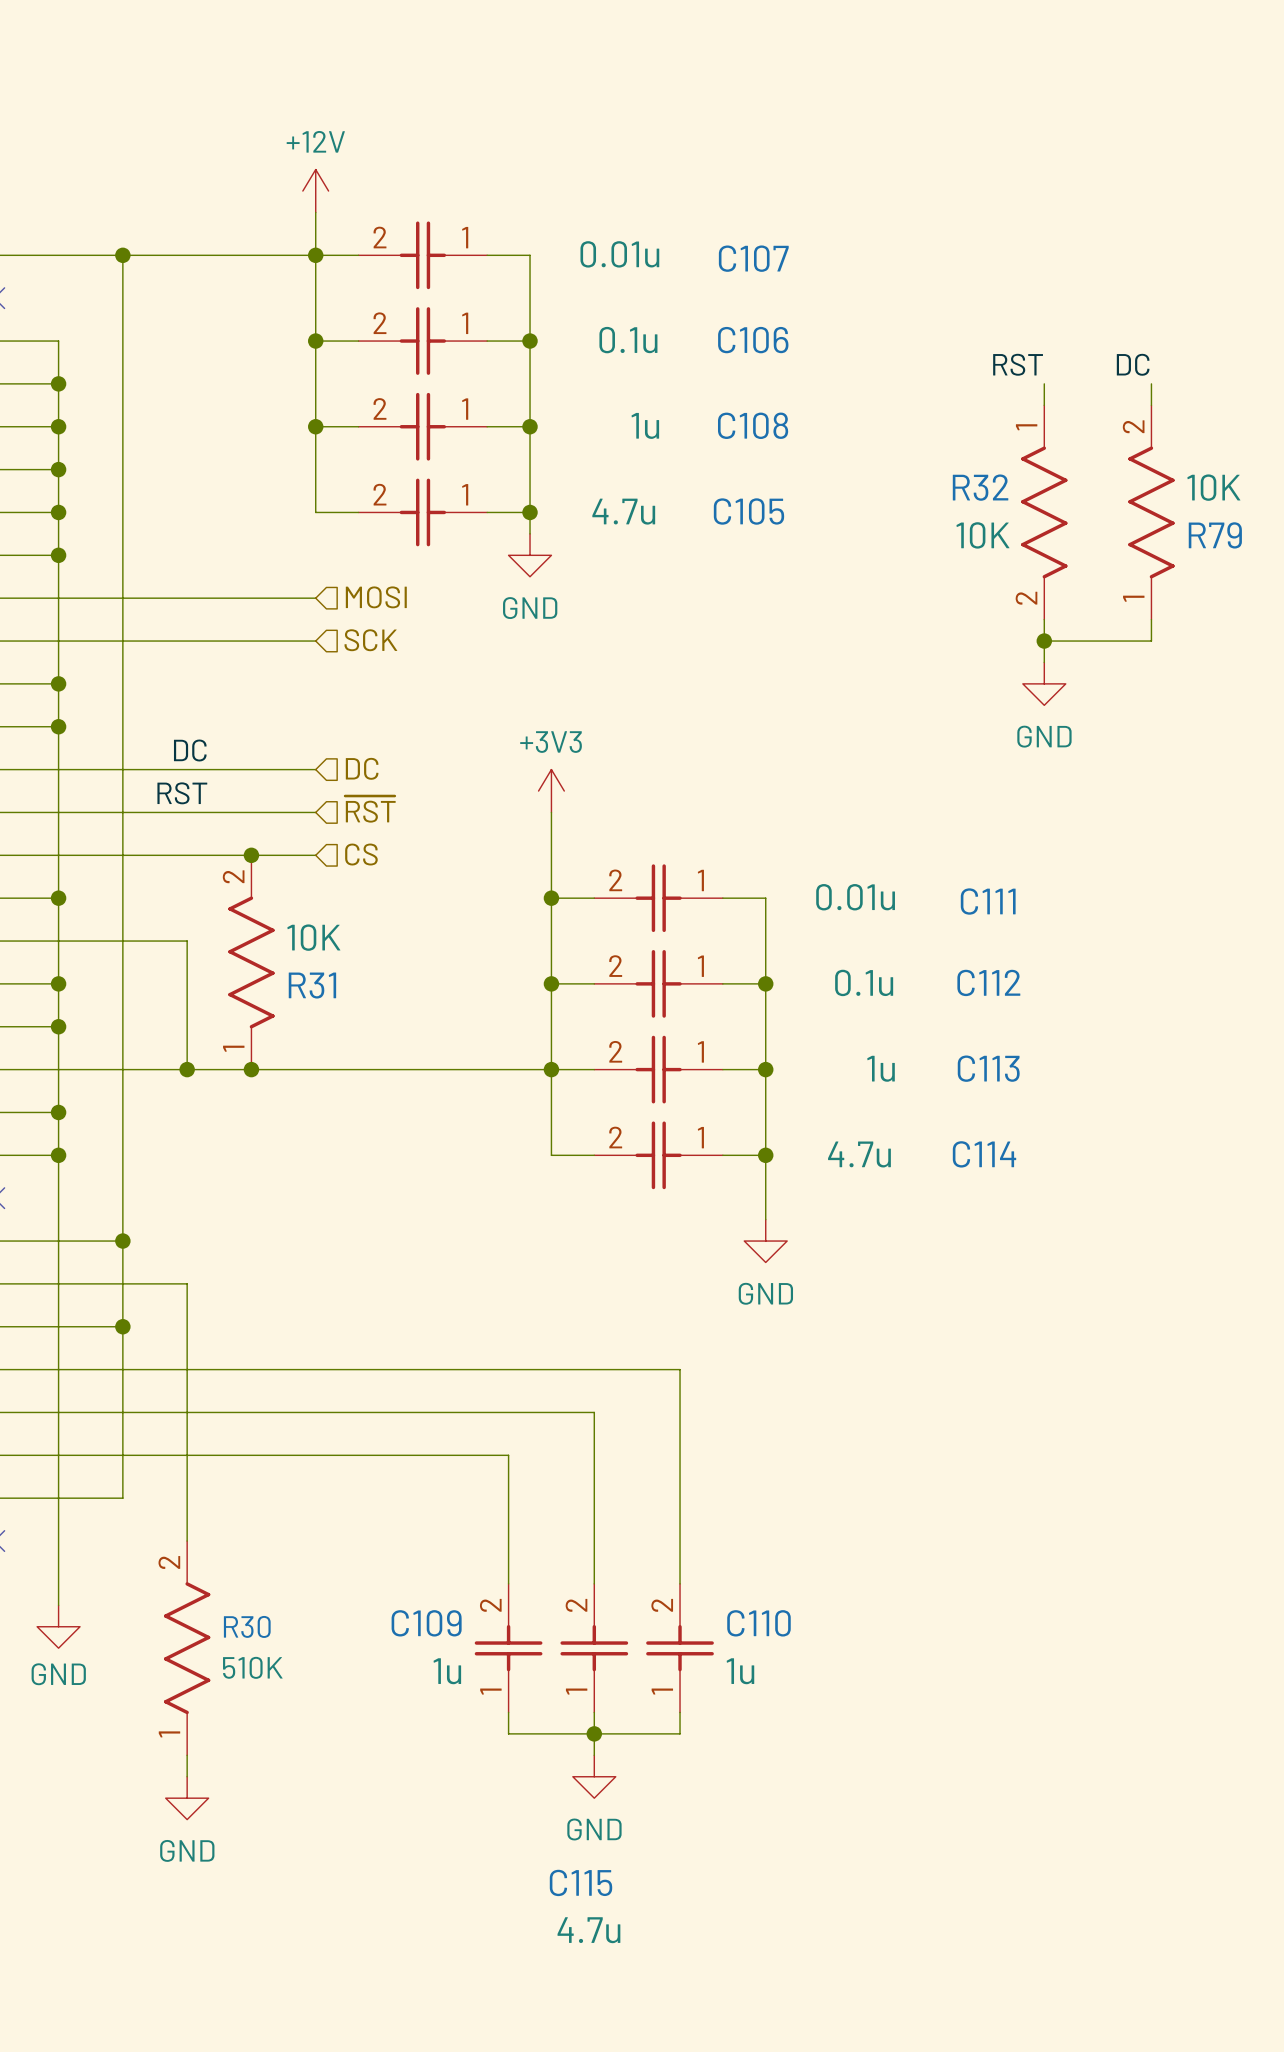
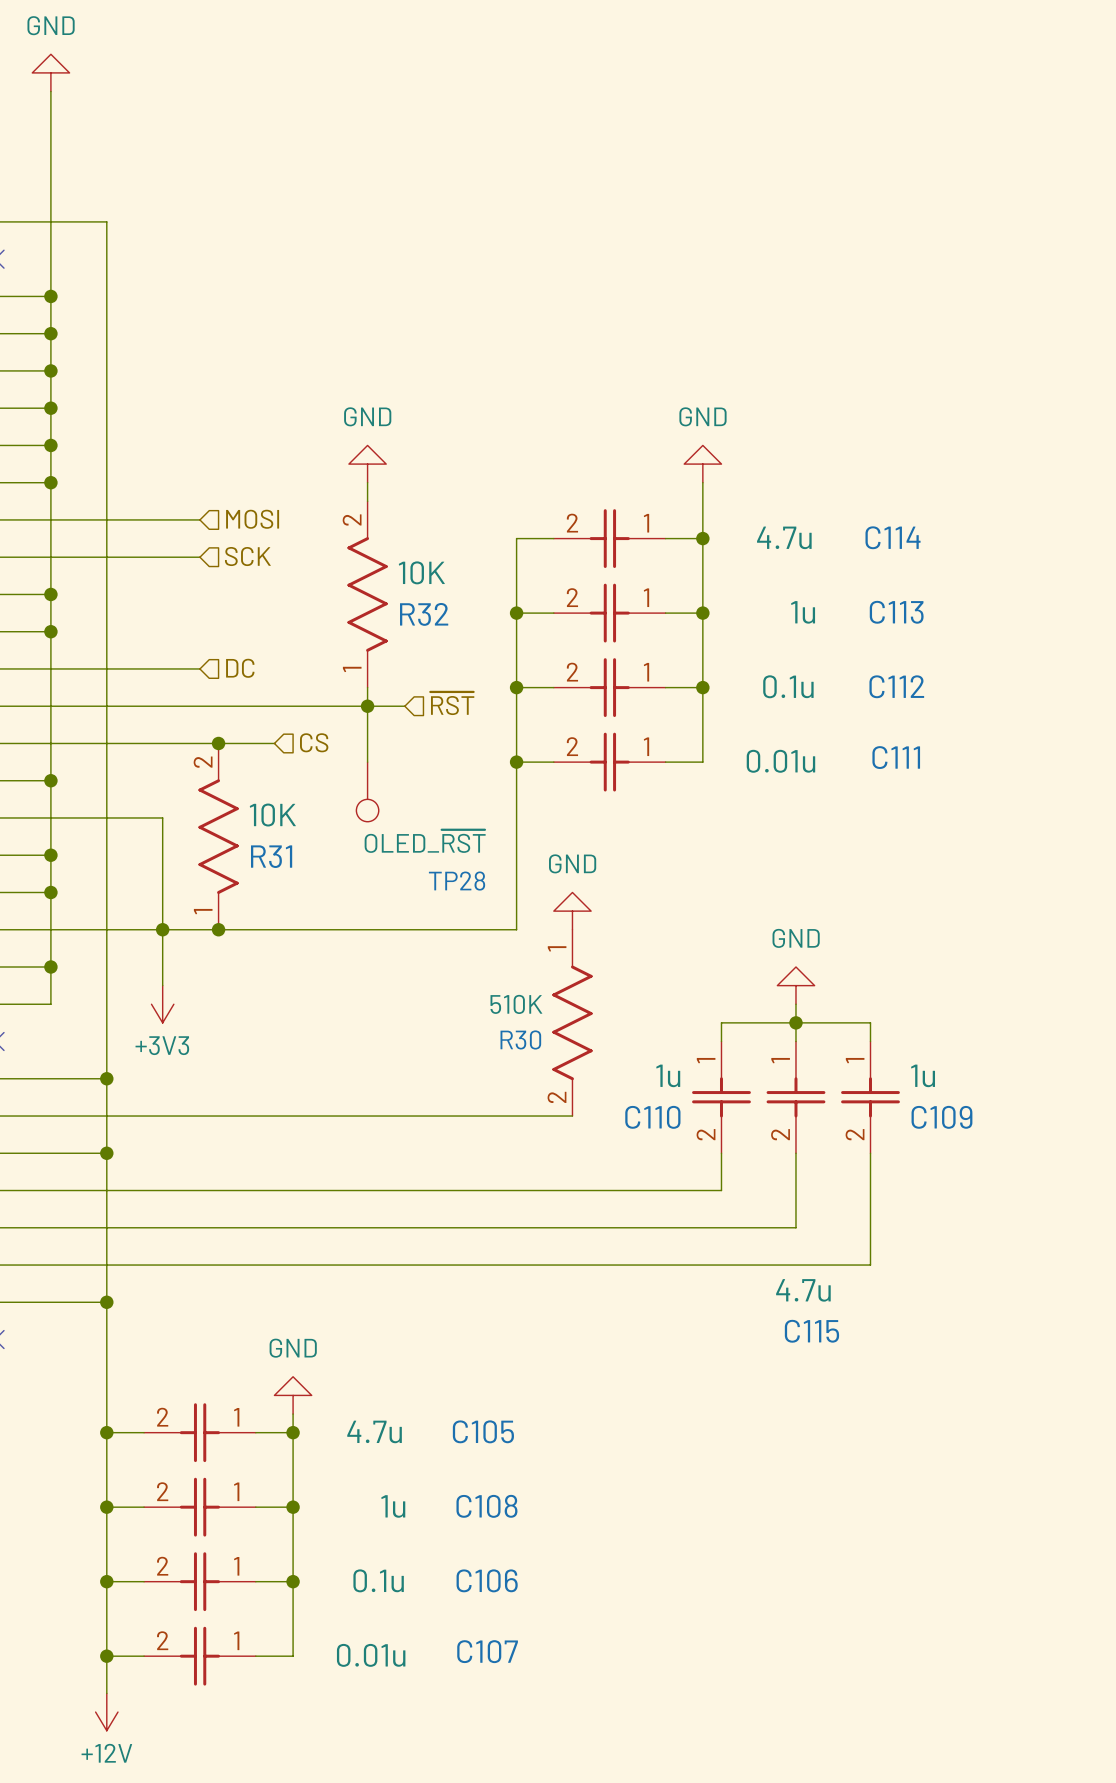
power symbol: none -> GND (50, 72)
wire: none -> (50, 91) (50, 296)
power symbol: +12V (315, 191) -> none
wire: (315, 212) (315, 512) (358, 512) -> none
wire: (122, 255) (358, 255) -> none
junction: (122, 255) -> none
junction: (315, 255) -> none
C107 position: (422, 255) -> (199, 1656)
wire: (487, 255) (530, 255) (530, 533) -> none
C107 name position: C107 (753, 258) -> C107 (487, 1651)
junction: none -> (50, 296)
wire: (315, 341) (358, 341) -> none
junction: (315, 341) -> none
C106 position: (422, 341) -> (199, 1581)
wire: (487, 341) (530, 341) -> (665, 538) (702, 538)
junction: (530, 341) -> none
label: RST (1018, 364) -> none
label: DC (1133, 364) -> none
wire: (1044, 383) (1044, 405) -> none
wire: (1151, 383) (1151, 405) -> none
wire: (315, 426) (358, 426) -> (516, 613) (553, 613)
junction: (315, 426) -> none
C108 position: (422, 426) -> (199, 1507)
wire: (487, 426) (530, 426) -> (665, 613) (702, 613)
junction: (530, 426) -> none
C105 position: (422, 512) -> (199, 1432)
wire: (487, 512) (530, 512) -> (665, 687) (702, 687)
junction: (530, 512) -> none
R32 rotation: 0° (1044, 512) -> 180° (367, 594)
R32 position: (1044, 512) -> (367, 594)
R79: 10K (1151, 512) -> none
power symbol: none -> GND (702, 464)
wire: none -> (367, 482) (367, 501)
power symbol rotation: 0° (530, 555) -> 180° (367, 464)
power symbol position: GND (530, 555) -> GND (367, 464)
wire: none -> (702, 482) (702, 762) (665, 762)
hierarchical label position: MOSI (376, 597) -> MOSI (252, 519)
wire: (230, 598) (315, 598) -> none
wire: none -> (553, 538) (516, 538) (516, 929)
junction: none -> (702, 538)
wire: (1044, 619) (1044, 662) -> none
wire: (1151, 619) (1151, 641) (1044, 641) -> none
hierarchical label position: SCK (370, 640) -> SCK (247, 556)
wire: (230, 641) (315, 641) -> none
junction: (1044, 641) -> none
power symbol: GND (1044, 683) -> none
junction: none -> (516, 613)
junction: none -> (702, 613)
label: DC (190, 750) -> none
hierarchical label position: DC (362, 768) -> DC (240, 668)
wire: (230, 769) (315, 769) -> none
wire: none -> (367, 687) (367, 762)
power symbol: +3V3 (551, 791) -> none
junction: none -> (516, 687)
junction: none -> (702, 687)
label: RST (182, 793) -> none
hierarchical label position: ~{RST} (370, 809) -> ~{RST} (452, 703)
wire: none -> (274, 706) (404, 706)
junction: none -> (367, 706)
wire: (551, 812) (551, 1155) (594, 1155) -> none
wire: (551, 898) (594, 898) -> none
junction position: (551, 898) -> (516, 762)
C111 position: (658, 898) -> (609, 762)
wire: (722, 898) (765, 898) (765, 1219) -> none
C111 name position: C111 (988, 901) -> C111 (896, 757)
TP28: none -> OLED_~{RST} (367, 791)
wire: (551, 983) (594, 983) -> (516, 687) (553, 687)
junction: (551, 983) -> none
C112 position: (658, 983) -> (609, 687)
wire: (722, 983) (765, 983) -> none
junction: (765, 983) -> none
power symbol: none -> GND (572, 911)
wire: none -> (162, 929) (162, 985)
junction: (551, 1069) -> none
C113 position: (658, 1069) -> (609, 613)
wire: (722, 1069) (765, 1069) -> none
junction: (765, 1069) -> none
power symbol: none -> GND (795, 985)
wire: (58, 1155) (58, 1605) -> (106, 1302) (106, 1693)
junction: (58, 1155) -> none
power symbol: none -> +3V3 (162, 1004)
C114 position: (658, 1155) -> (609, 538)
wire: (722, 1155) (765, 1155) -> (516, 762) (553, 762)
junction: (765, 1155) -> none
wire: none -> (795, 1004) (795, 1041)
junction: none -> (795, 1022)
wire: none -> (721, 1041) (721, 1022) (870, 1022) (870, 1041)
power symbol: GND (765, 1241) -> none
wire: (187, 1283) (187, 1541) -> (162, 1116) (572, 1116)
wire: (680, 1369) (680, 1583) -> (591, 1190) (721, 1190) (721, 1153)
wire: (594, 1412) (594, 1583) -> (516, 1227) (795, 1227) (795, 1153)
wire: (508, 1455) (508, 1583) -> (442, 1265) (870, 1265) (870, 1153)
junction: none -> (106, 1302)
power symbol: none -> GND (293, 1395)
power symbol: GND (58, 1626) -> none
wire: none -> (293, 1414) (293, 1656) (255, 1656)
wire: none -> (106, 1432) (144, 1432)
junction: none -> (106, 1432)
R30 rotation: 0° (187, 1648) -> 180° (572, 1022)
R30 position: (187, 1648) -> (572, 1022)
wire: none -> (255, 1432) (293, 1432)
junction: none -> (293, 1432)
C109 rotation: 0° (508, 1648) -> 180° (870, 1097)
C109 position: (508, 1648) -> (870, 1097)
C115 rotation: 0° (594, 1648) -> 180° (795, 1097)
C115 position: (594, 1648) -> (795, 1097)
C110 rotation: 0° (680, 1648) -> 180° (721, 1097)
C110 position: (680, 1648) -> (721, 1097)
wire: (508, 1712) (508, 1733) (680, 1733) (680, 1712) -> none
wire: (594, 1712) (594, 1755) -> none
wire: none -> (106, 1507) (144, 1507)
junction: none -> (106, 1507)
wire: none -> (255, 1507) (293, 1507)
junction: none -> (293, 1507)
junction: (594, 1733) -> none
wire: (187, 1755) (187, 1776) -> none
power symbol: GND (594, 1776) -> none
power symbol: GND (187, 1798) -> none
wire: none -> (106, 1581) (144, 1581)
junction: none -> (106, 1581)
wire: none -> (255, 1581) (293, 1581)
junction: none -> (293, 1581)
C115 name position: C115 (581, 1882) -> C115 (811, 1331)
wire: none -> (106, 1656) (144, 1656)
junction: none -> (106, 1656)
C115 value position: 4.7u (588, 1930) -> 4.7u (803, 1290)
power symbol: none -> +12V (106, 1712)

